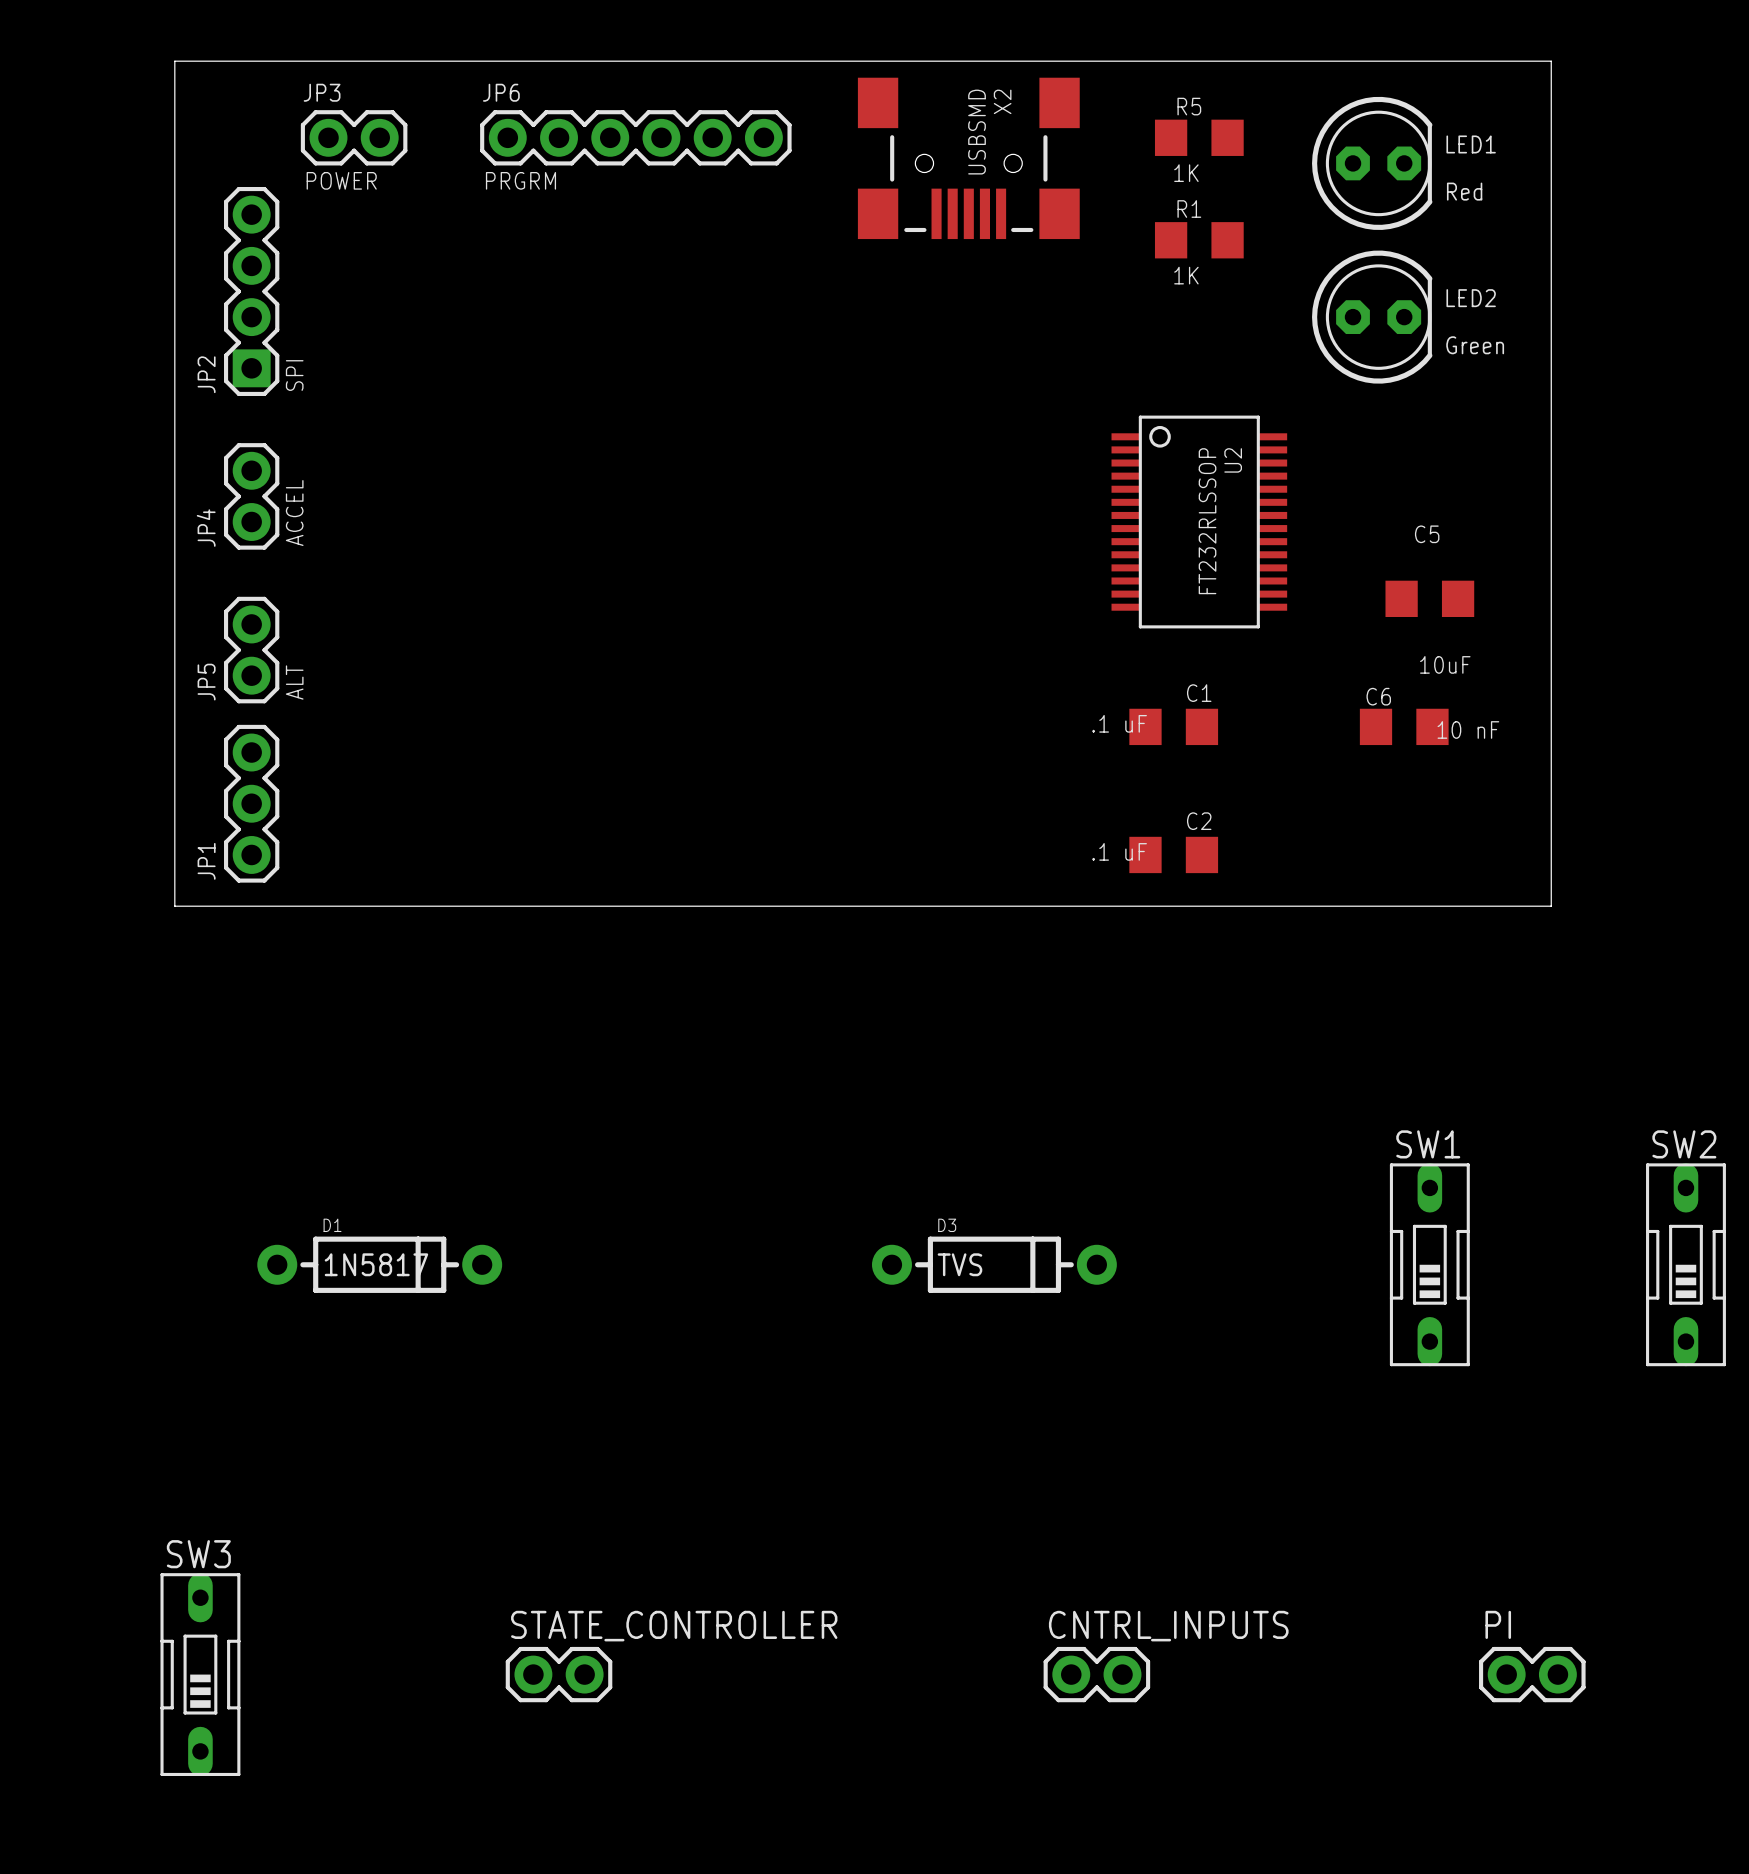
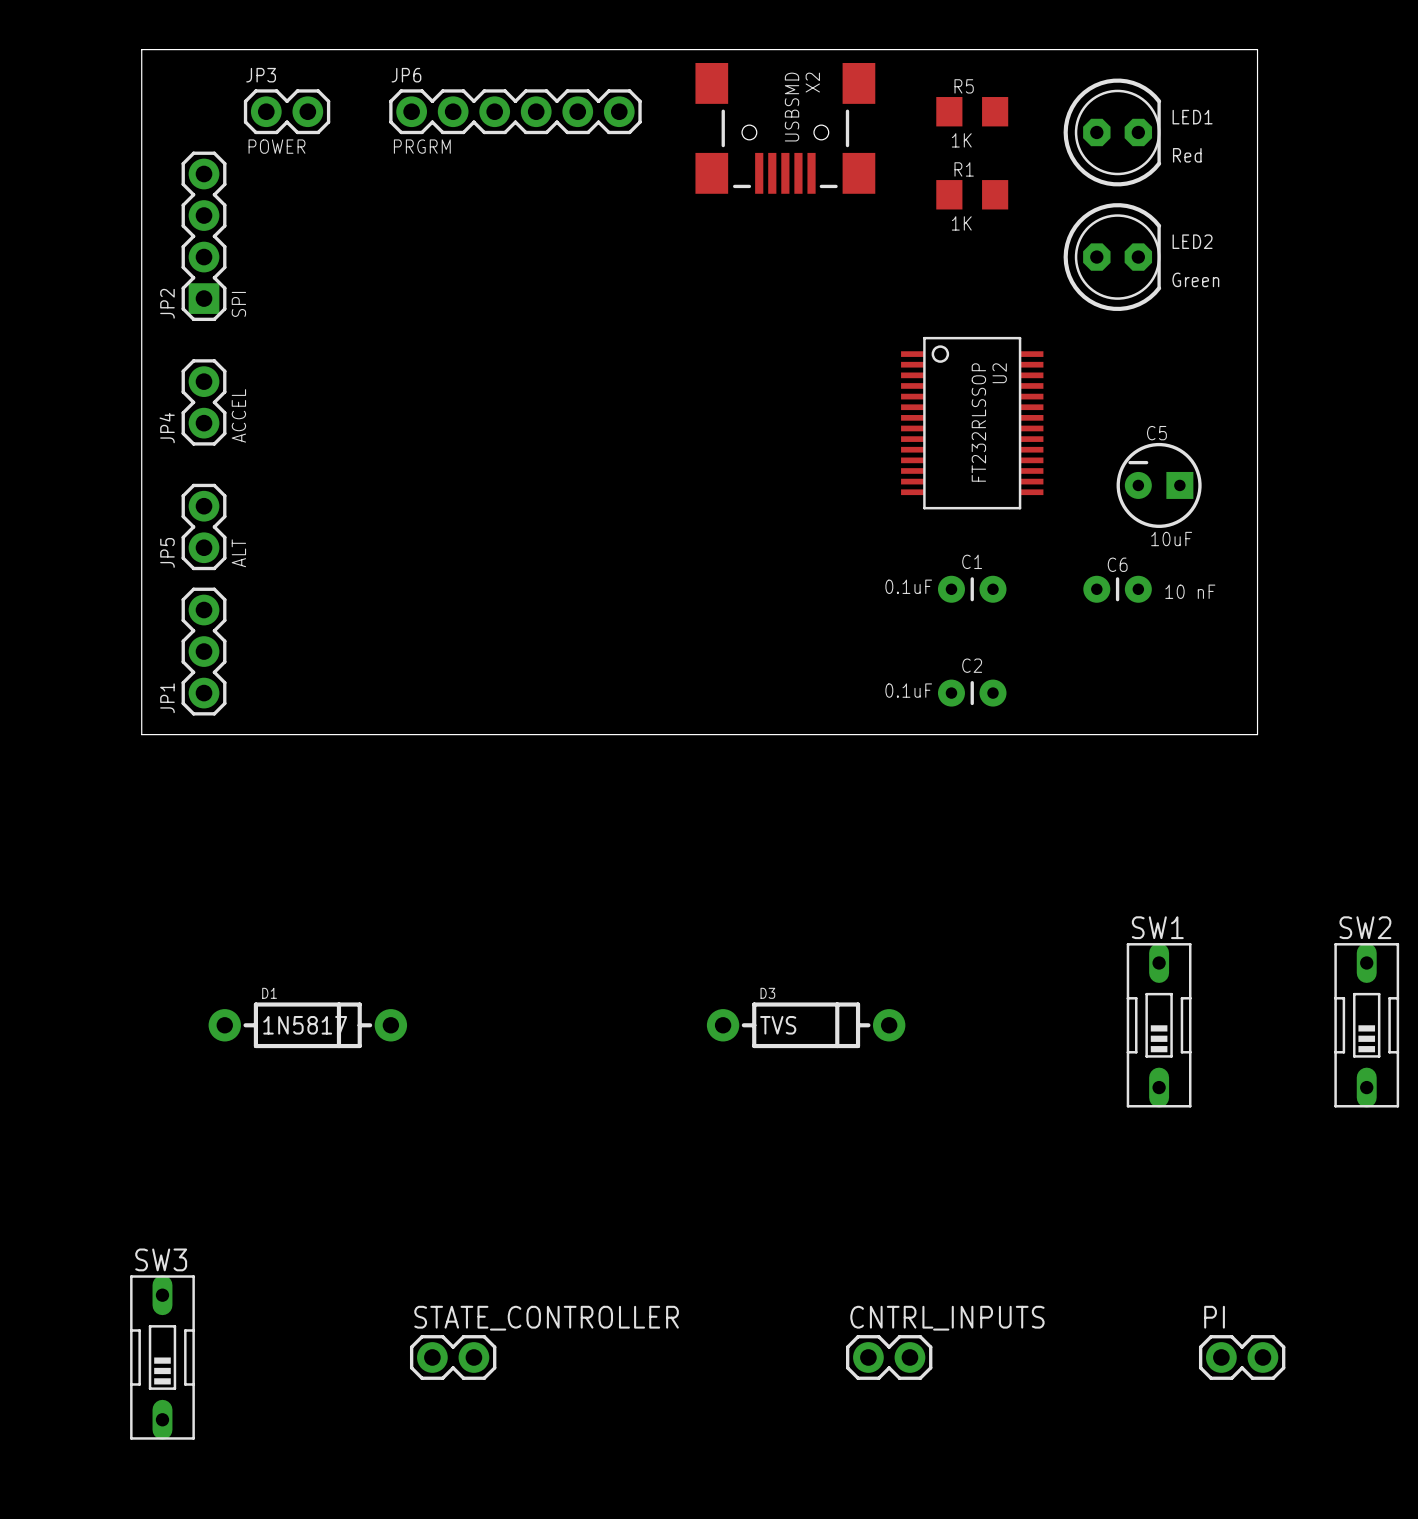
C5 footprint: [1385, 580, 1475, 617] -> [1116, 442, 1202, 528]
C1 footprint: [1129, 708, 1219, 746] -> [937, 575, 1007, 603]
C6 footprint: [1359, 708, 1449, 746] -> [1083, 575, 1152, 603]
C1 value: .1 uF (1119, 723) -> 0.1uF (908, 586)
C2 footprint: [1129, 836, 1219, 874] -> [937, 679, 1007, 707]
C2 value: .1 uF (1119, 851) -> 0.1uF (908, 690)

